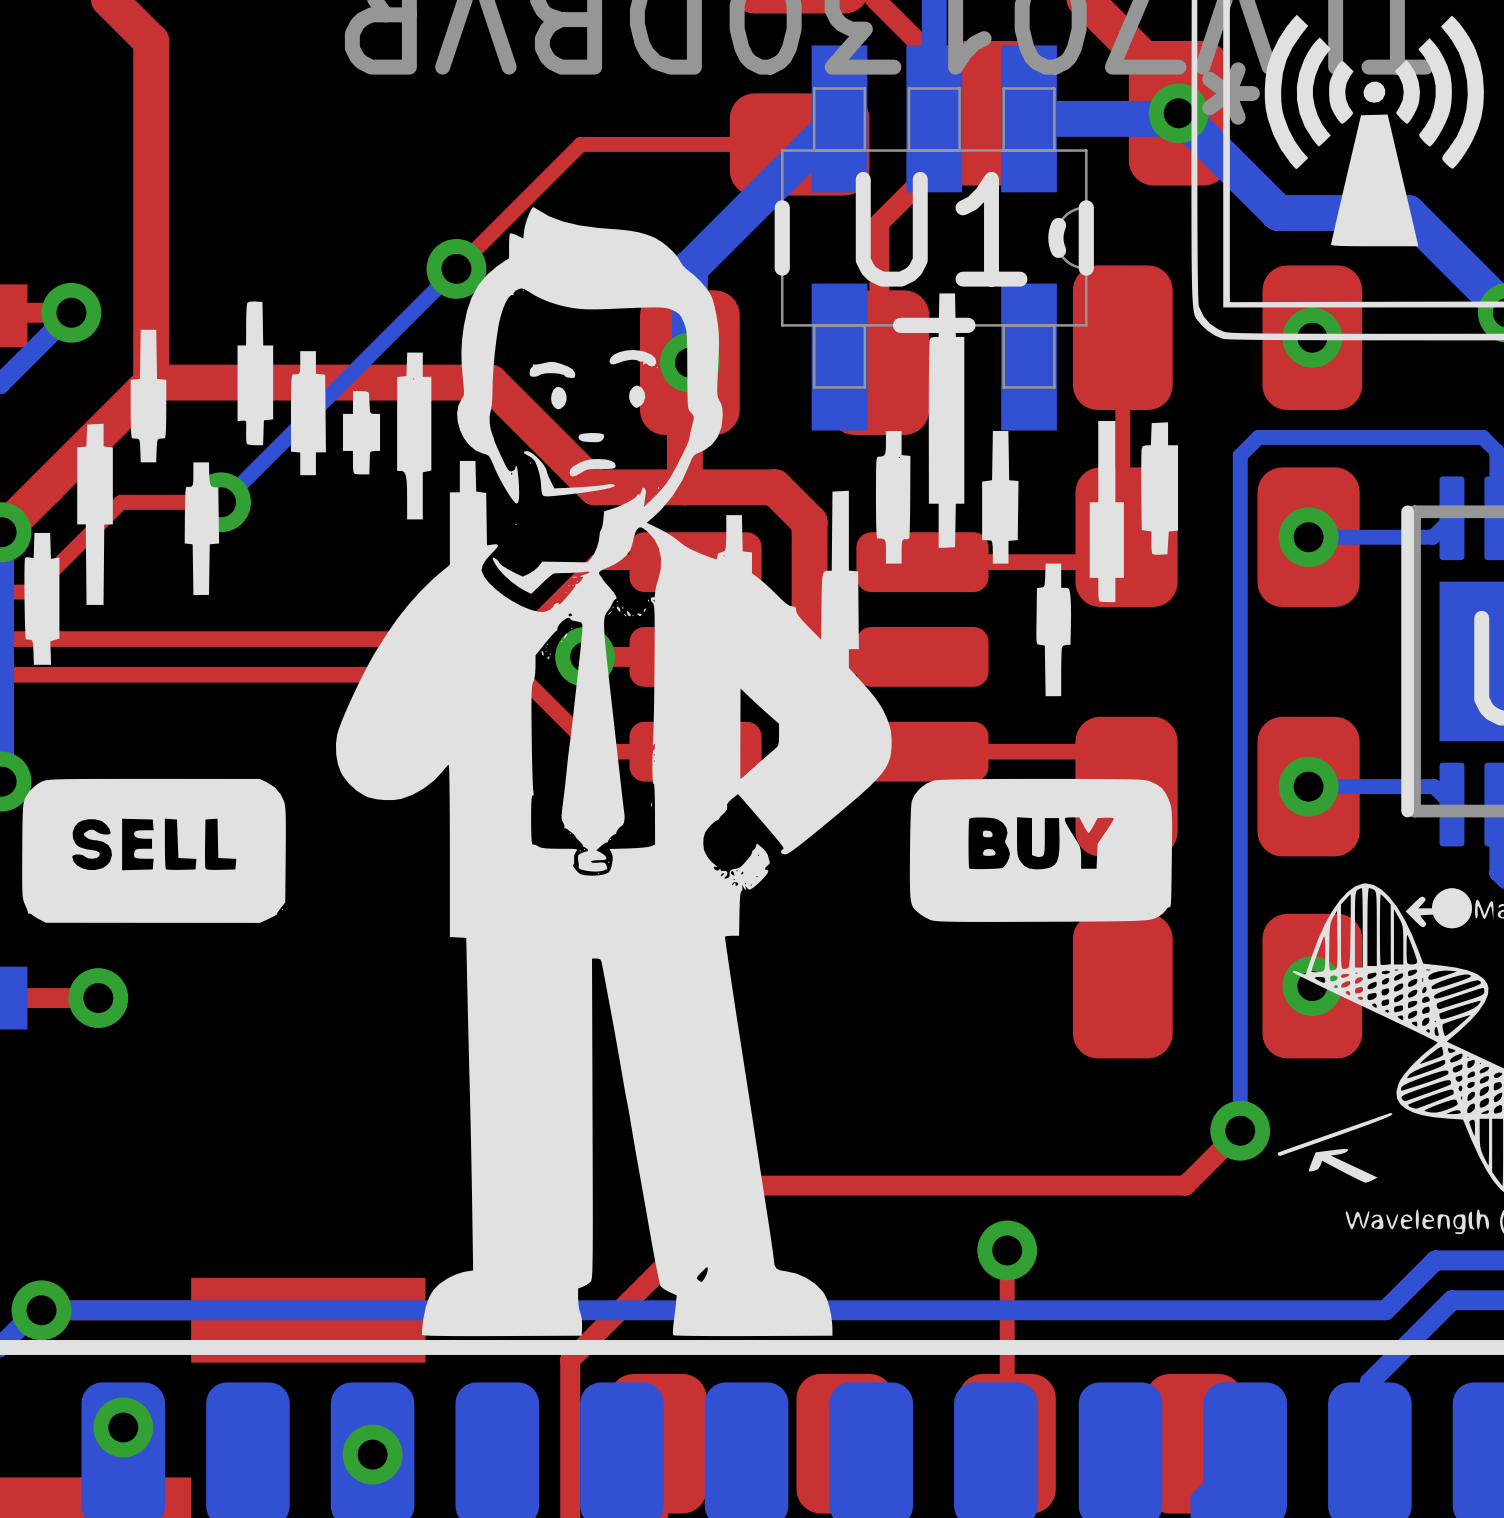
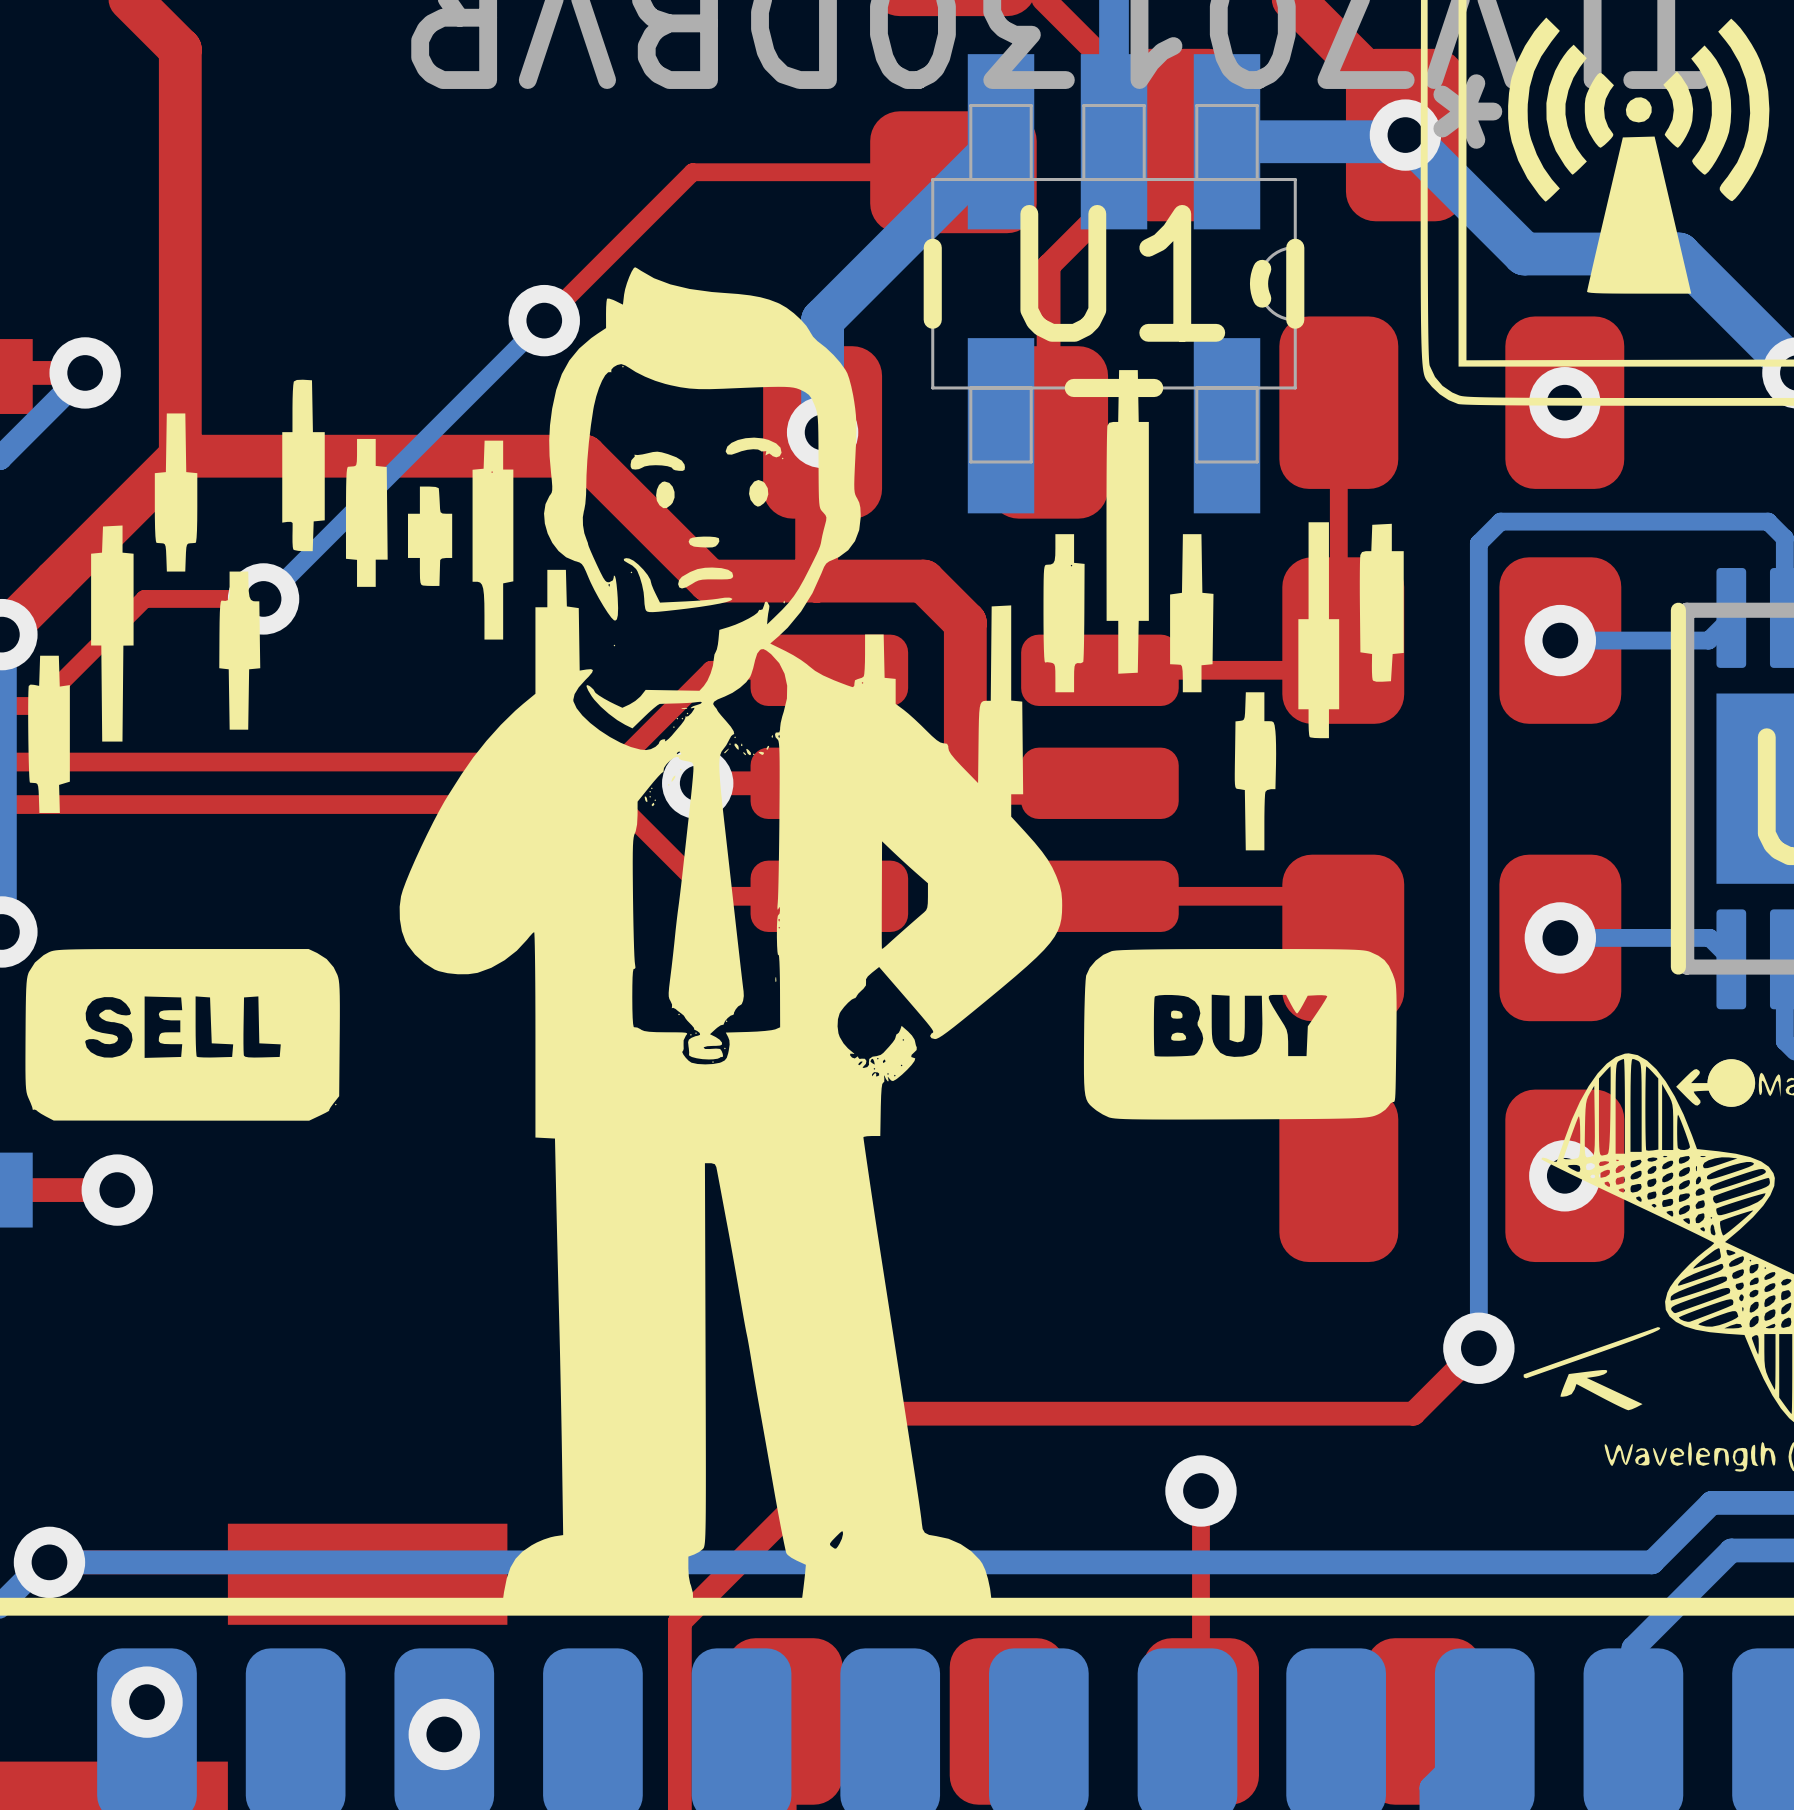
drawing position: (600, 771) -> (714, 940)

